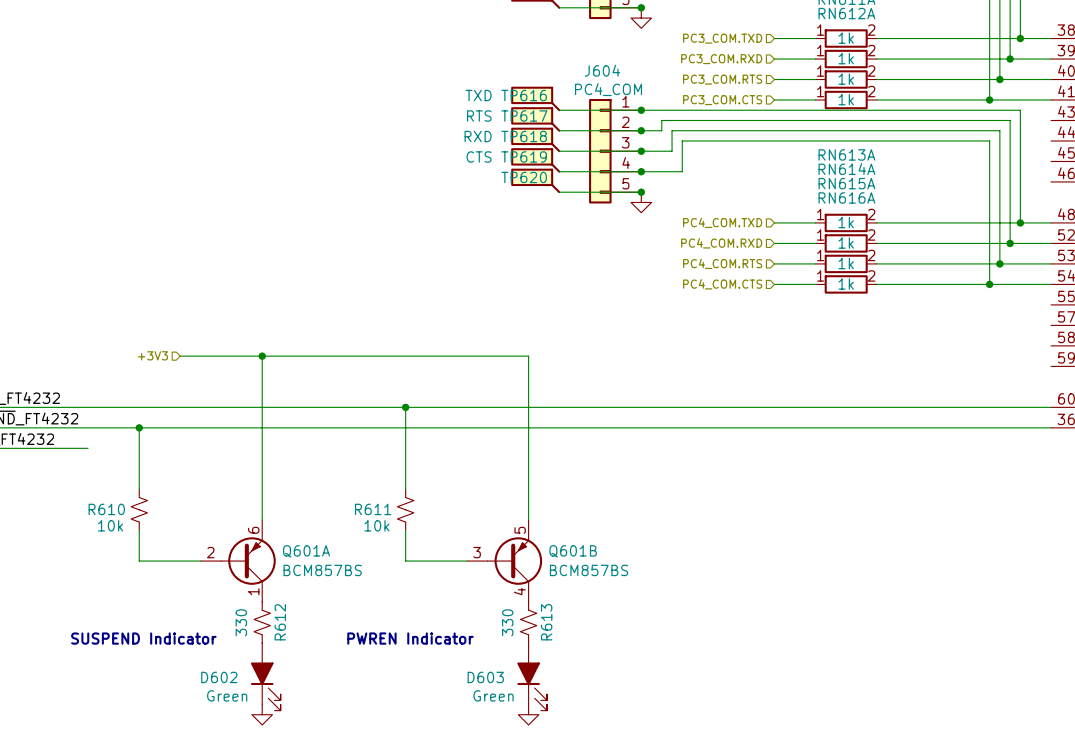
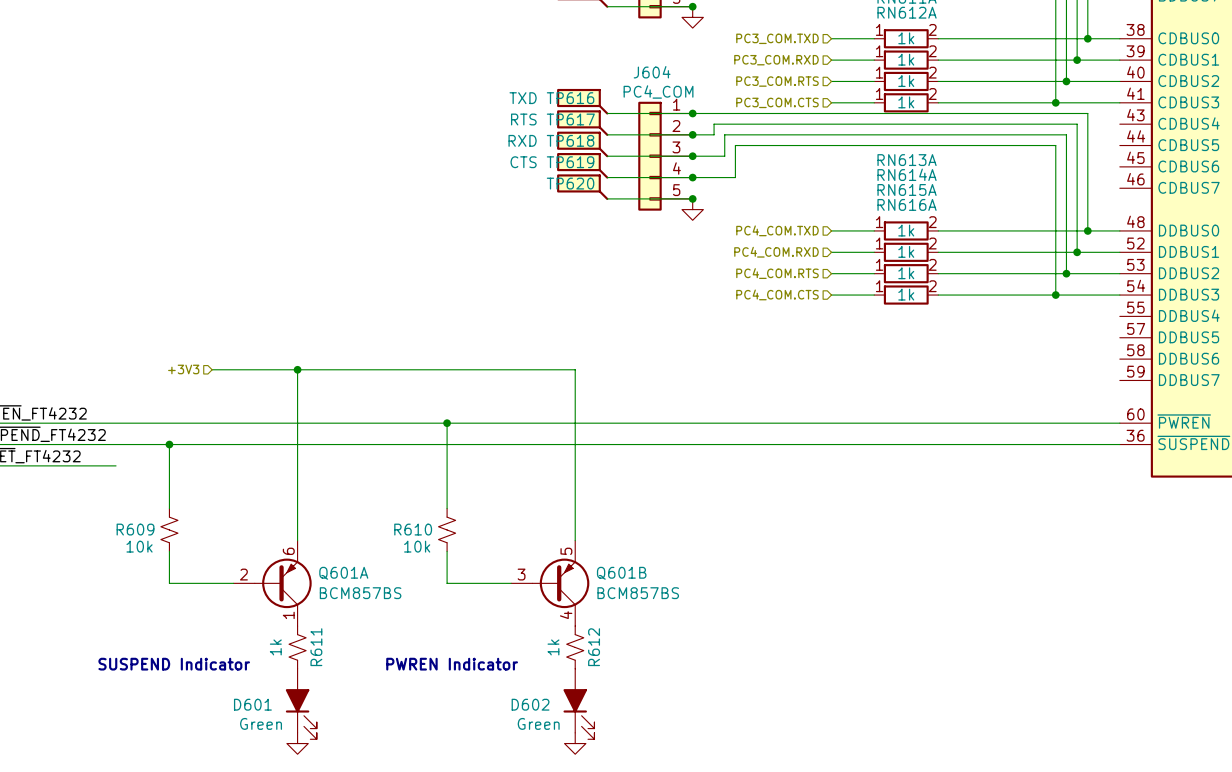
R610 name: R610 (106, 509) -> R609 (135, 529)
R611 name: R611 (373, 509) -> R610 (413, 529)
R612 value: 330 (241, 622) -> 1k (275, 647)
R612 name: R612 (280, 622) -> R611 (316, 647)
R613 value: 330 (507, 622) -> 1k (553, 647)
R613 name: R613 (546, 622) -> R612 (594, 647)
D602 name: D602 (219, 677) -> D601 (252, 704)
D603 name: D603 (485, 677) -> D602 (530, 704)

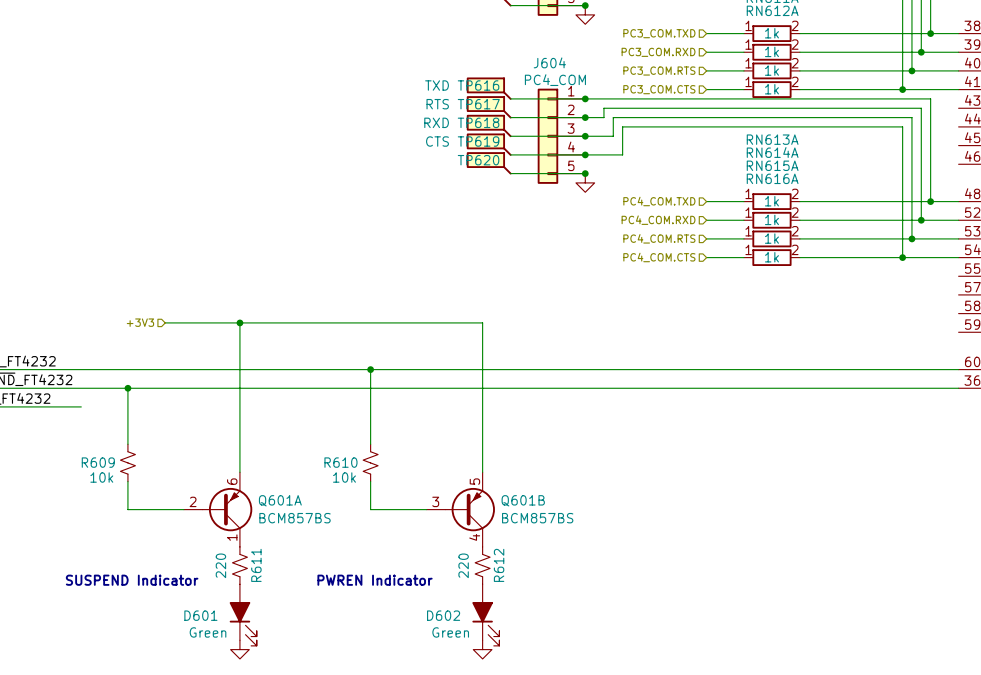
R611 value: 1k (275, 647) -> 220 (220, 565)
R612 value: 1k (553, 647) -> 220 (463, 565)

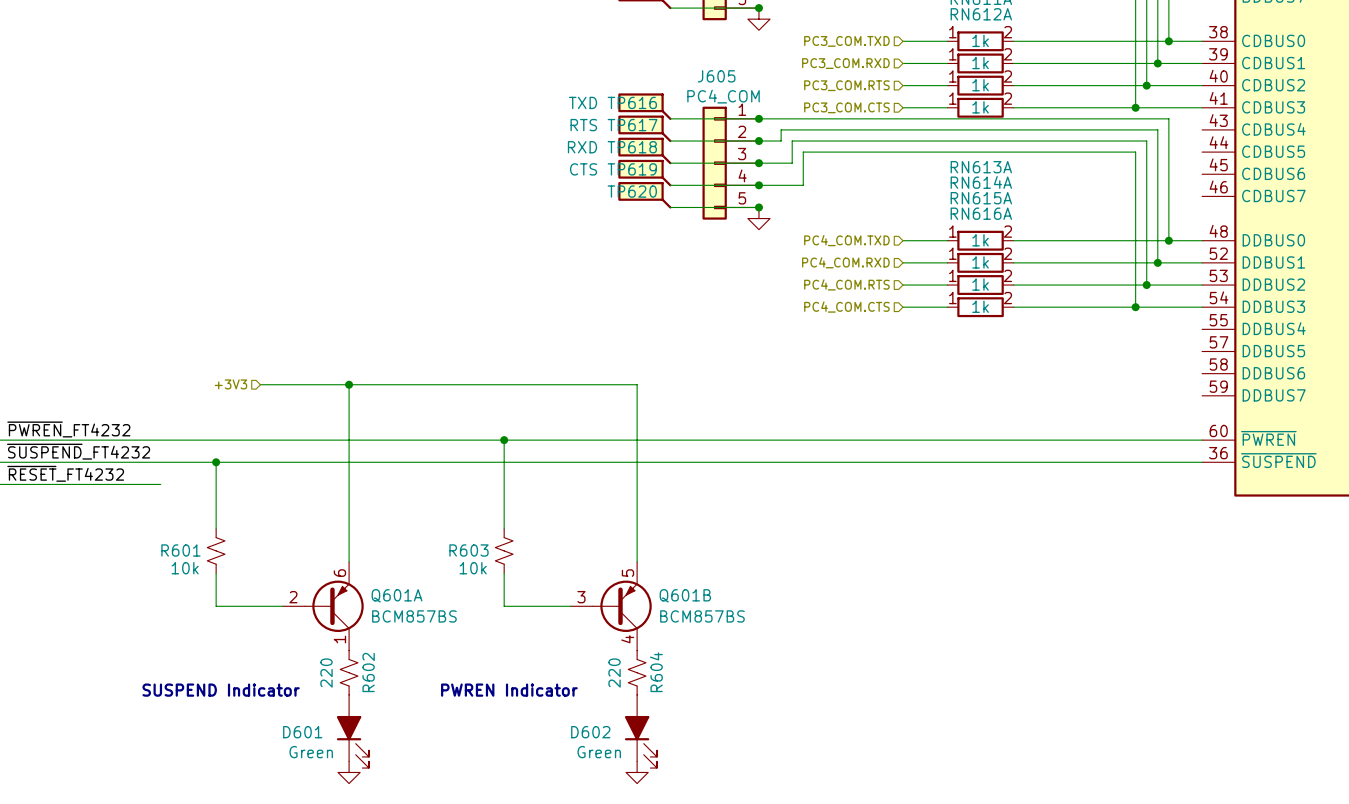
J604 name: J604 (549, 62) -> J605 (716, 76)
R609 name: R609 (98, 462) -> R601 (180, 550)
R610 name: R610 (340, 462) -> R603 (468, 550)
R611 name: R611 (256, 565) -> R602 (368, 672)
R612 name: R612 (499, 565) -> R604 (656, 672)

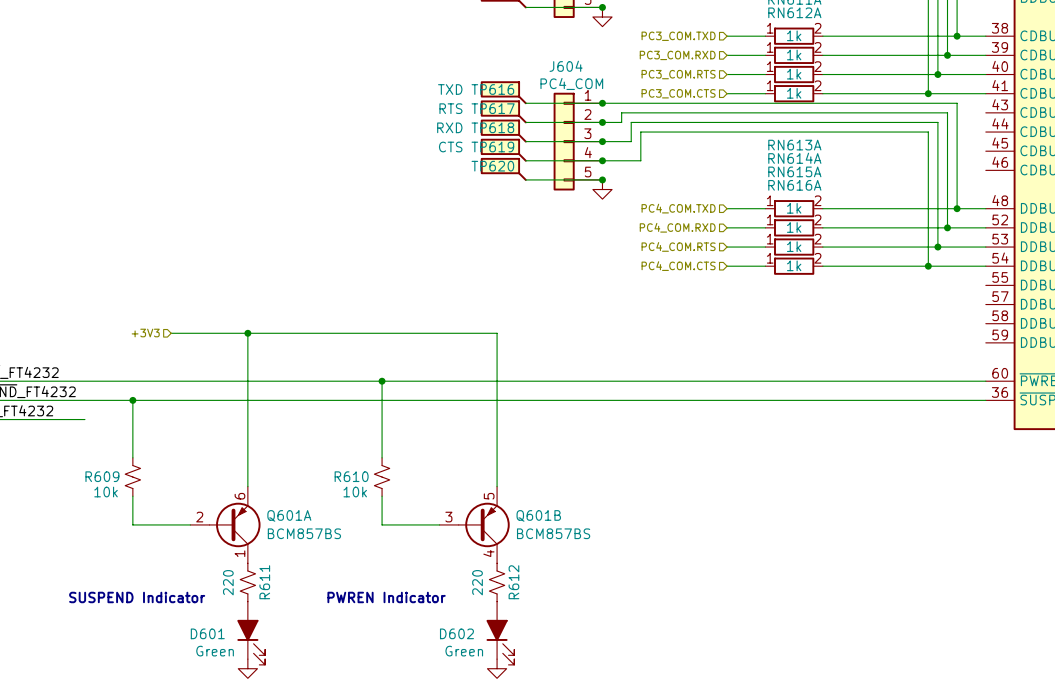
J605 name: J605 (716, 76) -> J604 (566, 66)
R601 name: R601 (180, 550) -> R609 (102, 476)
R603 name: R603 (468, 550) -> R610 (351, 476)
R602 name: R602 (368, 672) -> R611 (264, 582)
R604 name: R604 (656, 672) -> R612 (513, 582)

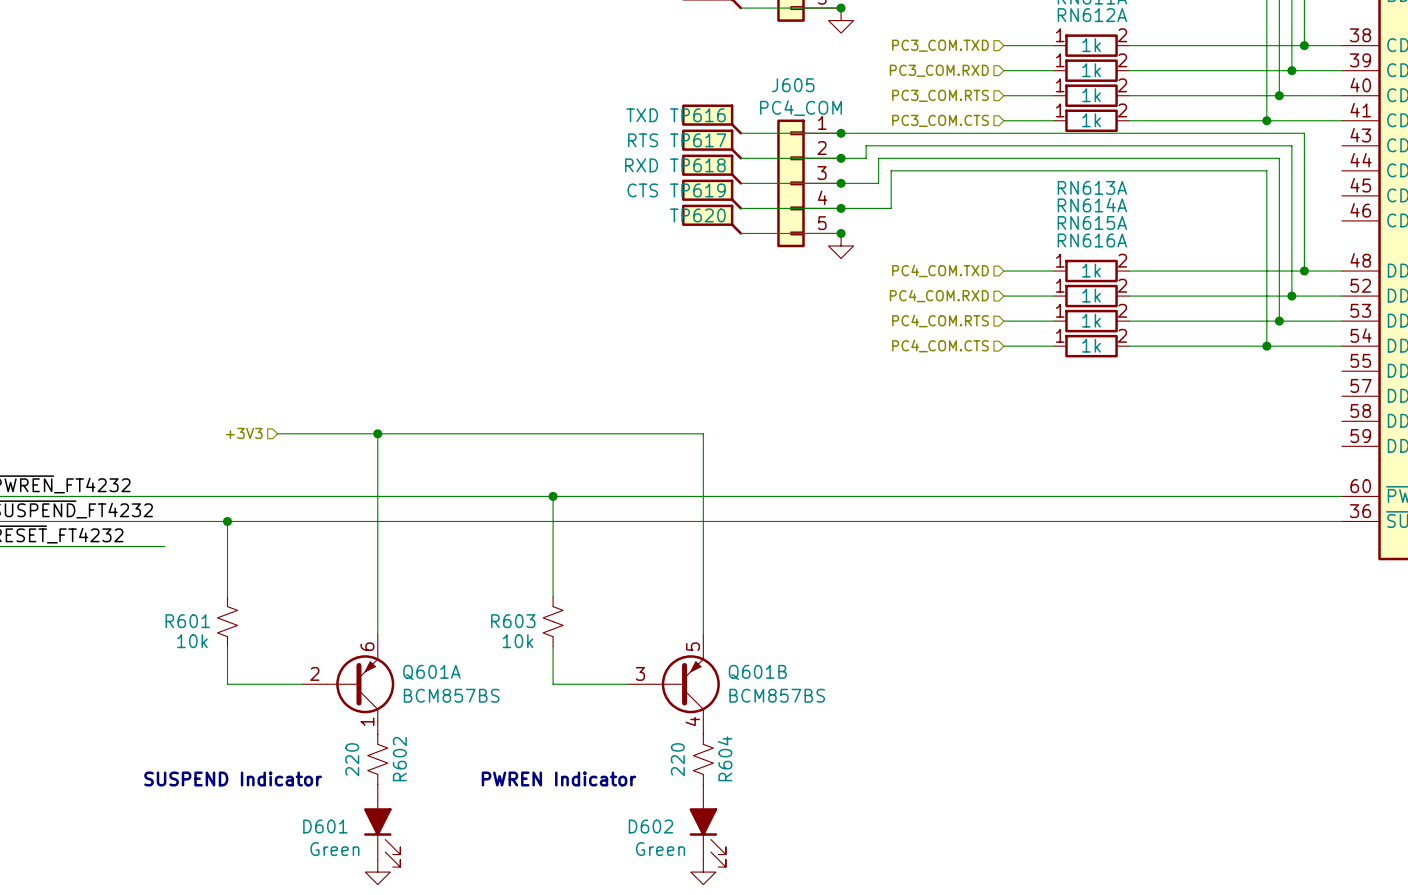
J604 name: J604 (566, 66) -> J605 (793, 85)
R609 name: R609 (102, 476) -> R601 (187, 621)
R610 name: R610 (351, 476) -> R603 (513, 621)
R611 name: R611 (264, 582) -> R602 (399, 759)
R612 name: R612 (513, 582) -> R604 (725, 758)

